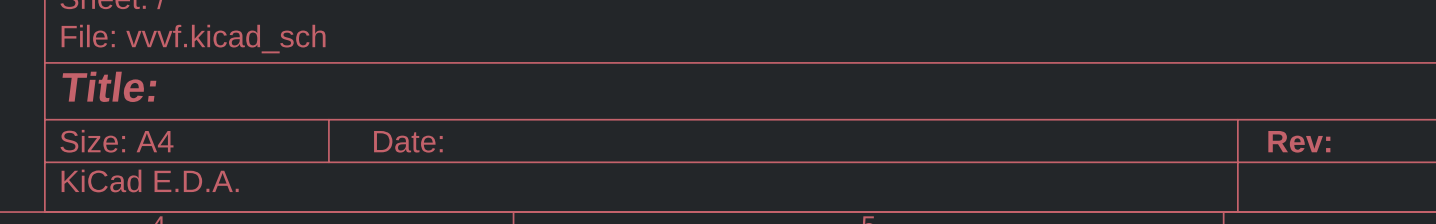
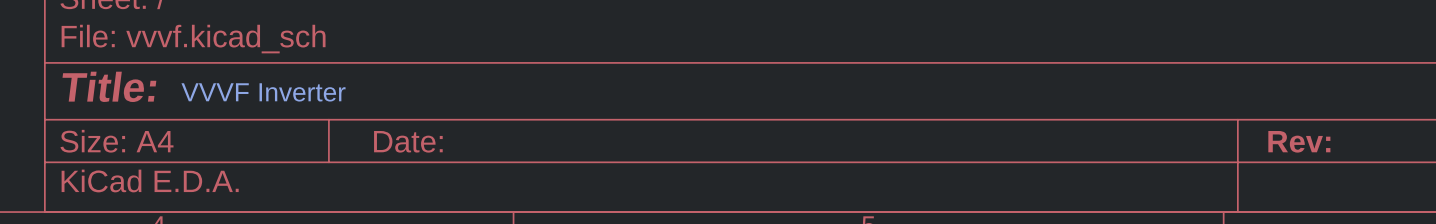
text: none -> VVVF Inverter (263, 92)

